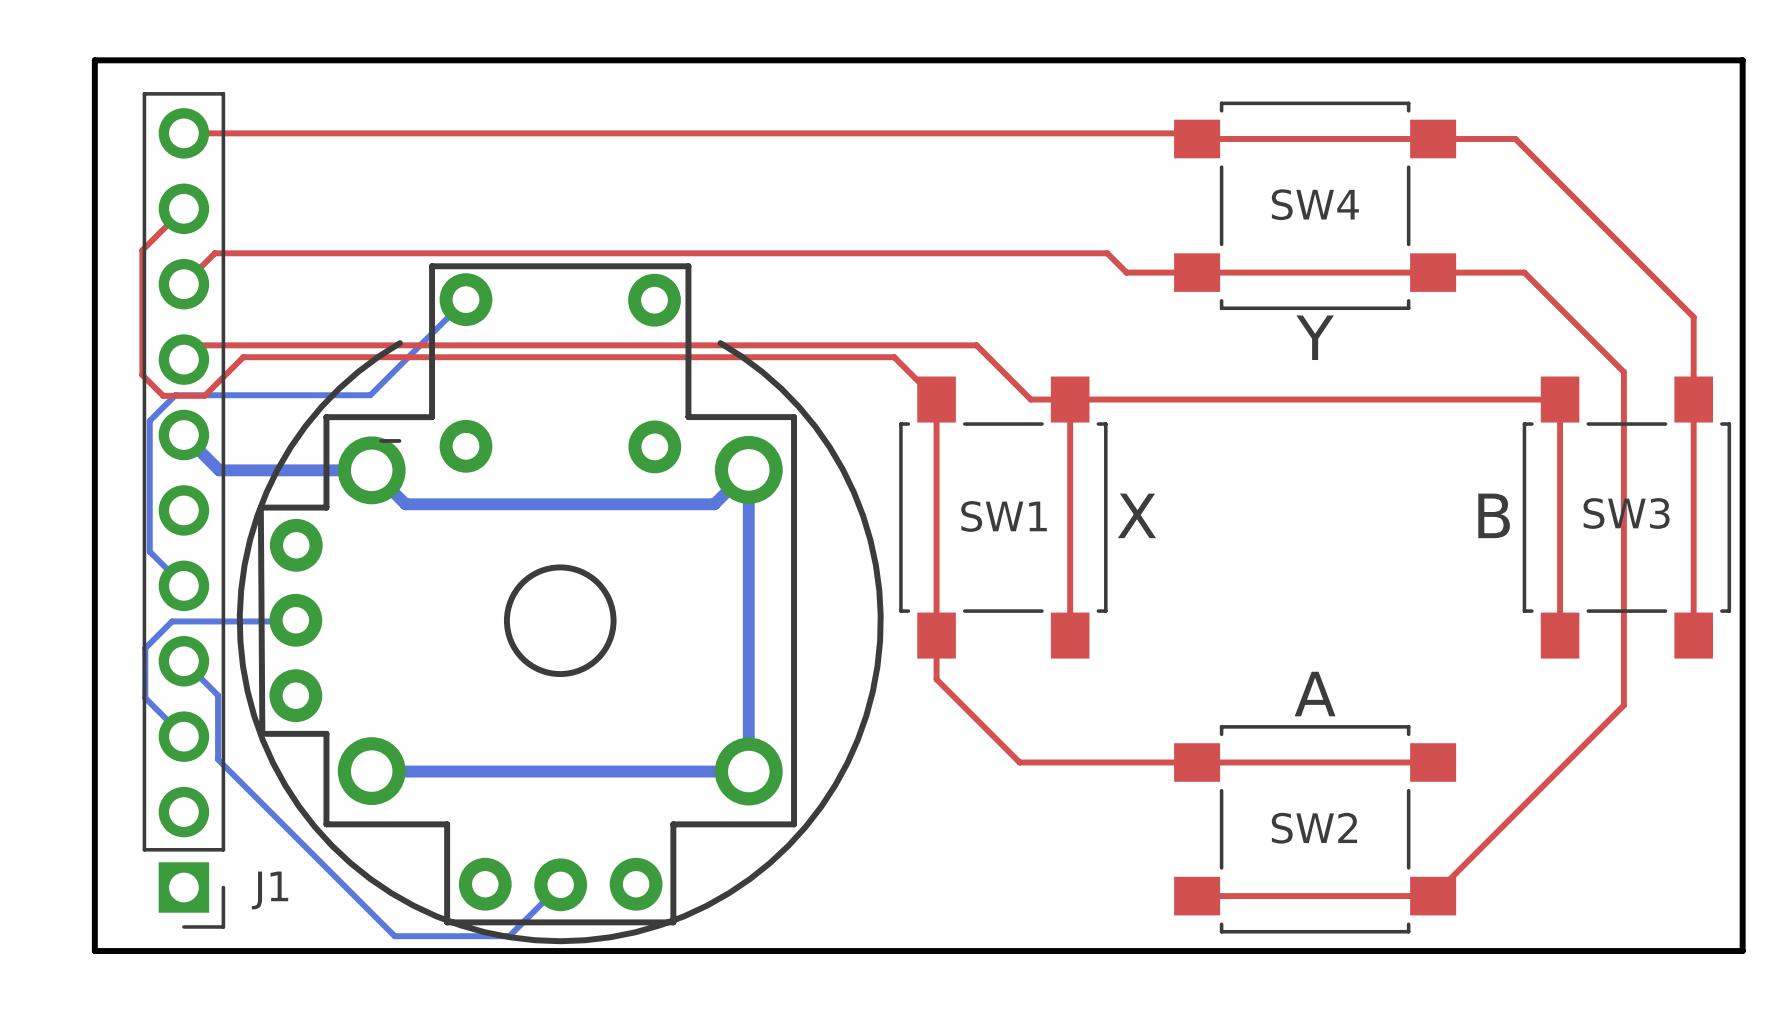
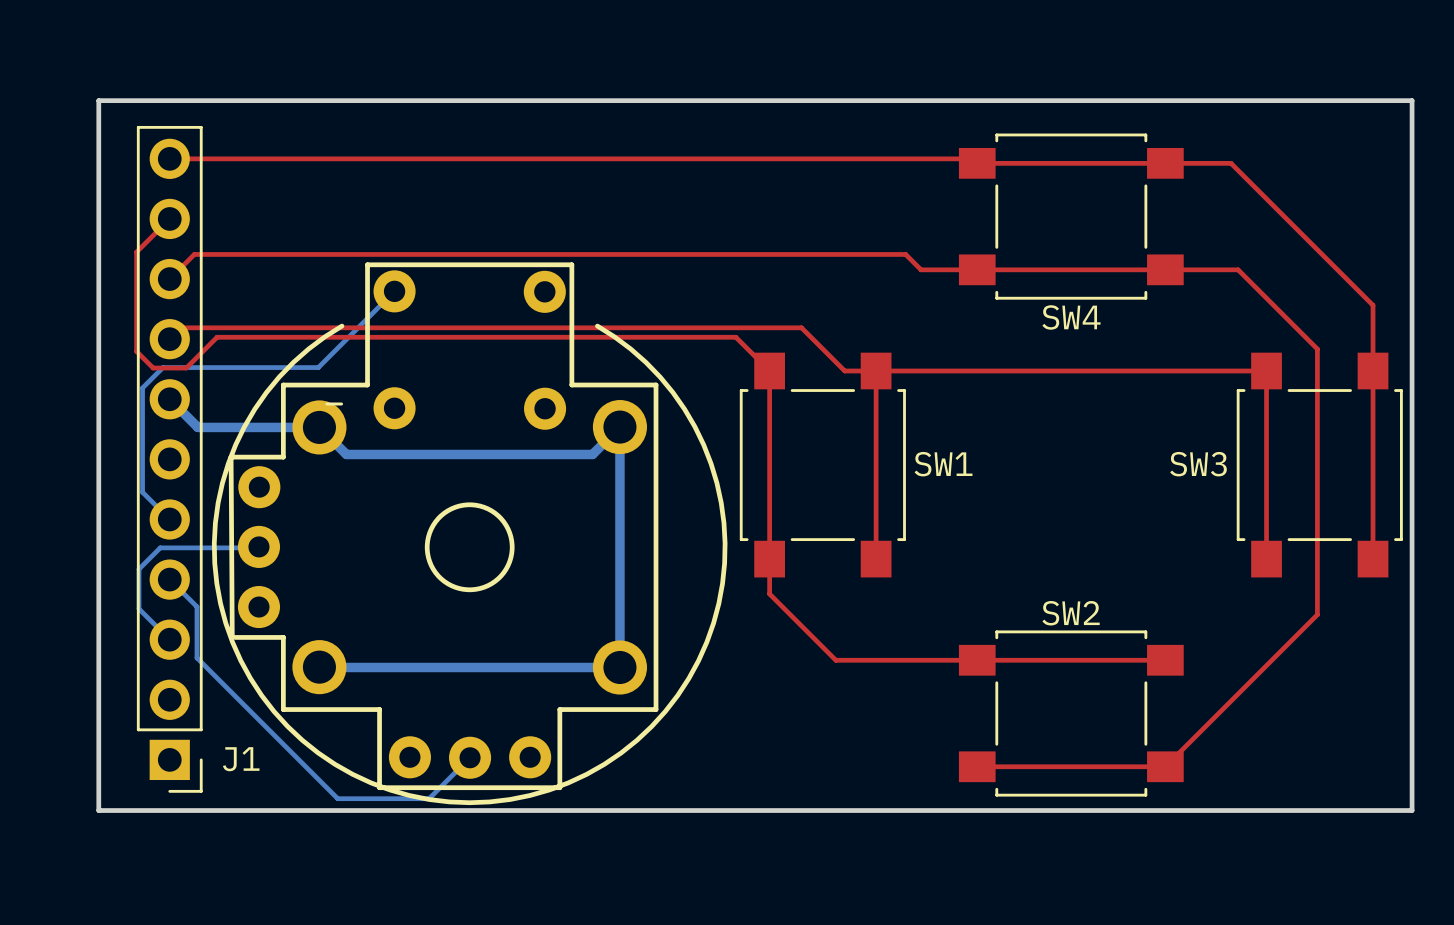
SW4 name position: SW4 (1315, 204) -> SW4 (1071, 317)
SW4 value: Y (1315, 337) -> none
SW3 name position: SW3 (1626, 513) -> SW3 (1198, 464)
SW1 value: X (1136, 515) -> none
SW3 value: B (1494, 515) -> none
SW1 name position: SW1 (1004, 516) -> SW1 (943, 464)
SW2 value: A (1315, 694) -> none
SW2 name position: SW2 (1314, 828) -> SW2 (1071, 613)

